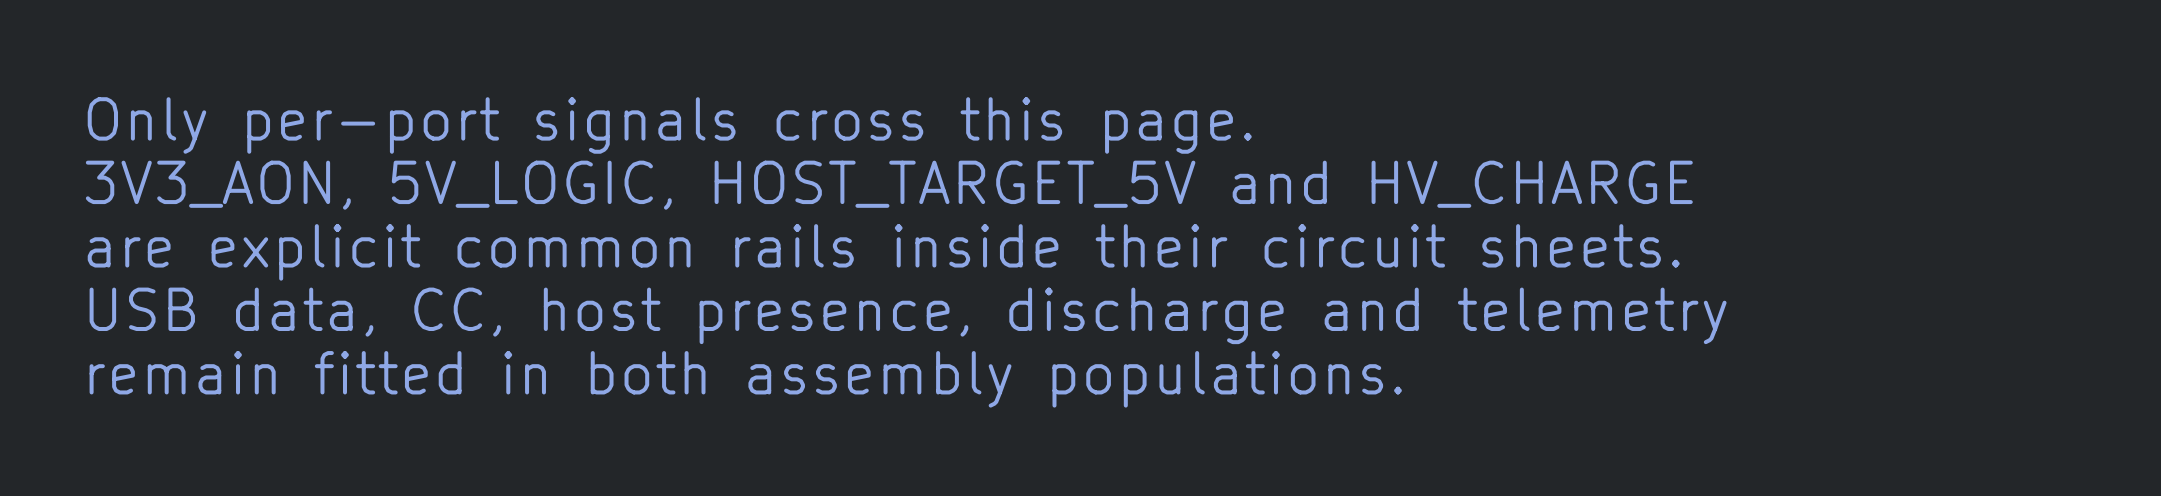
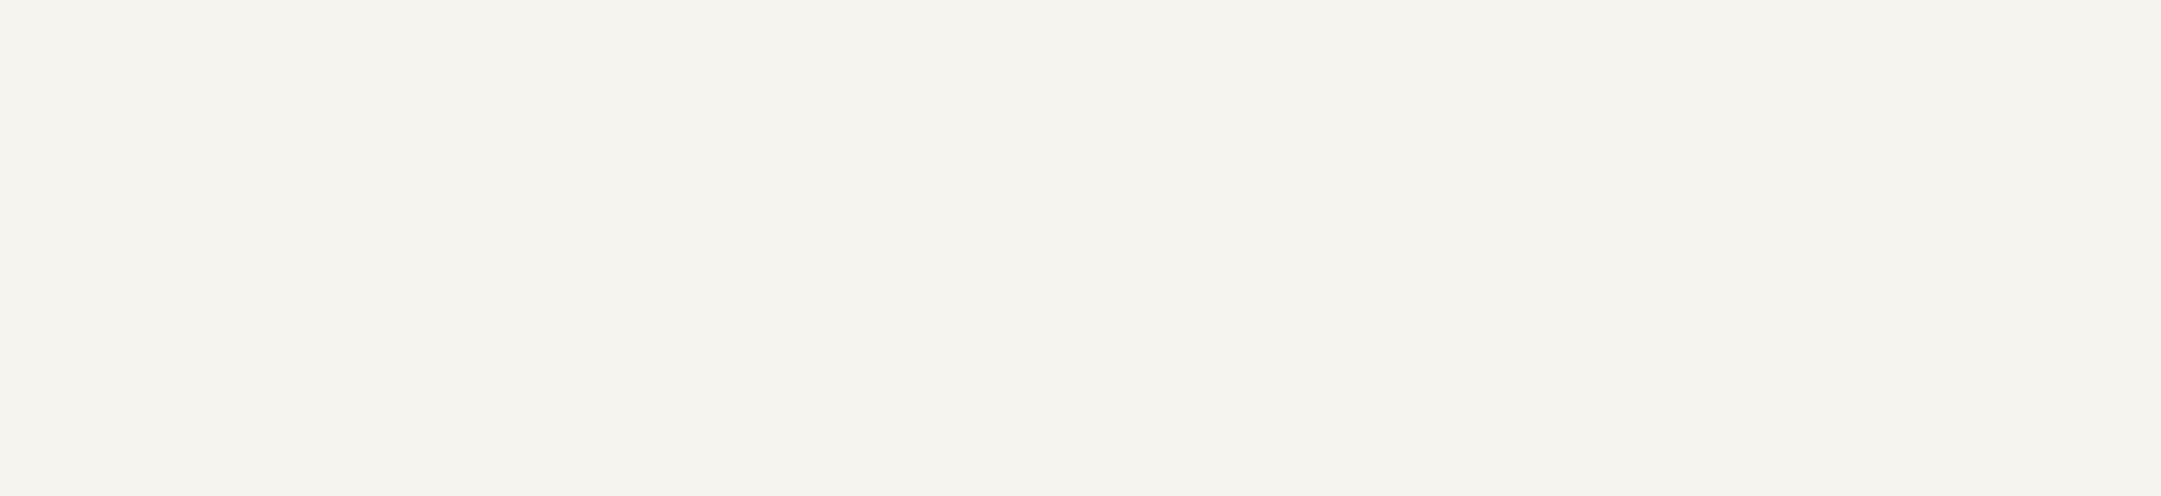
text: Only per-port signals cross this page. (669, 125) -> none
text: 3V3_AON, 5V_LOGIC, HOST_TARGET_5V and HV_CHARGE (889, 185) -> none
text: are explicit common rails inside their circuit sheets. (883, 252) -> none
text: USB data, CC, host presence, discharge and telemetry (908, 315) -> none
text: remain fitted in both assembly populations. (745, 379) -> none

